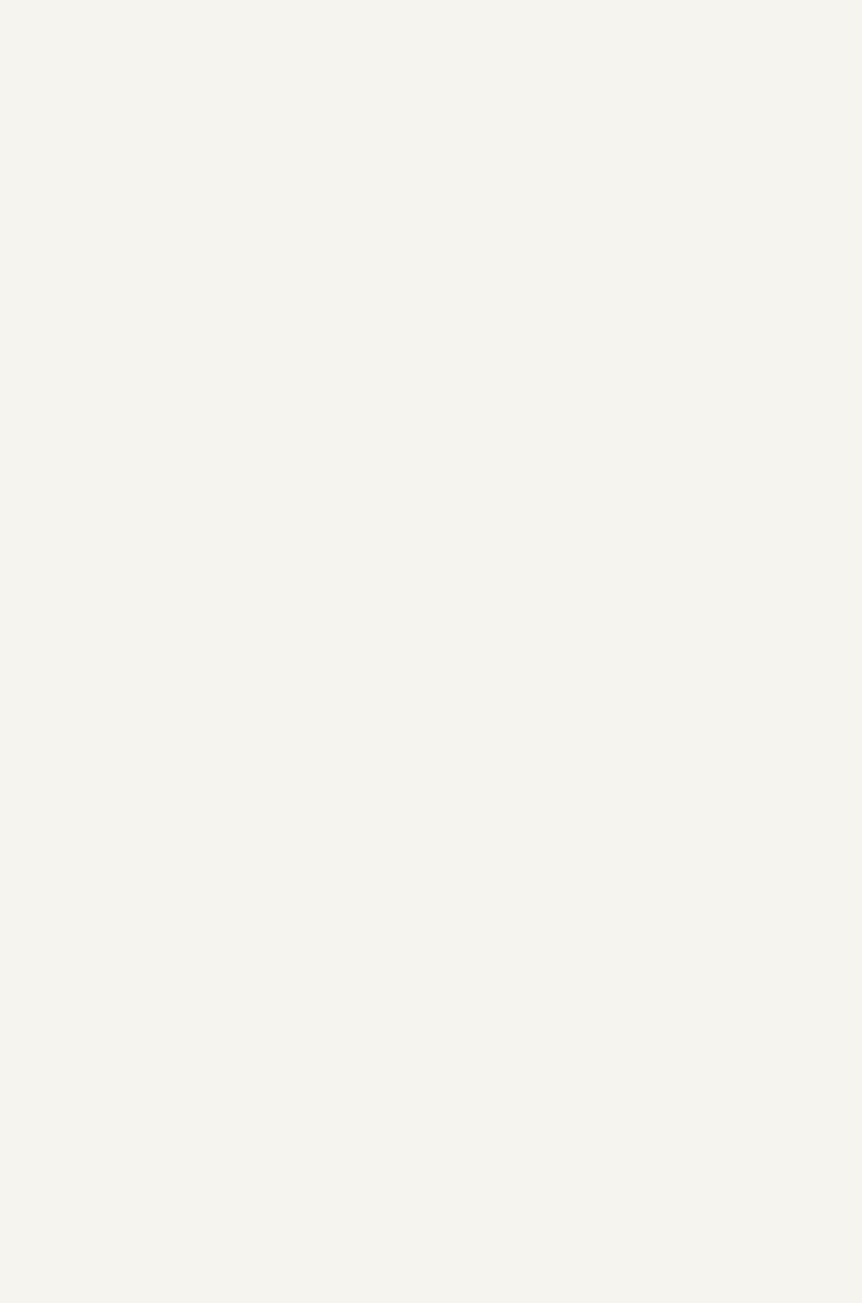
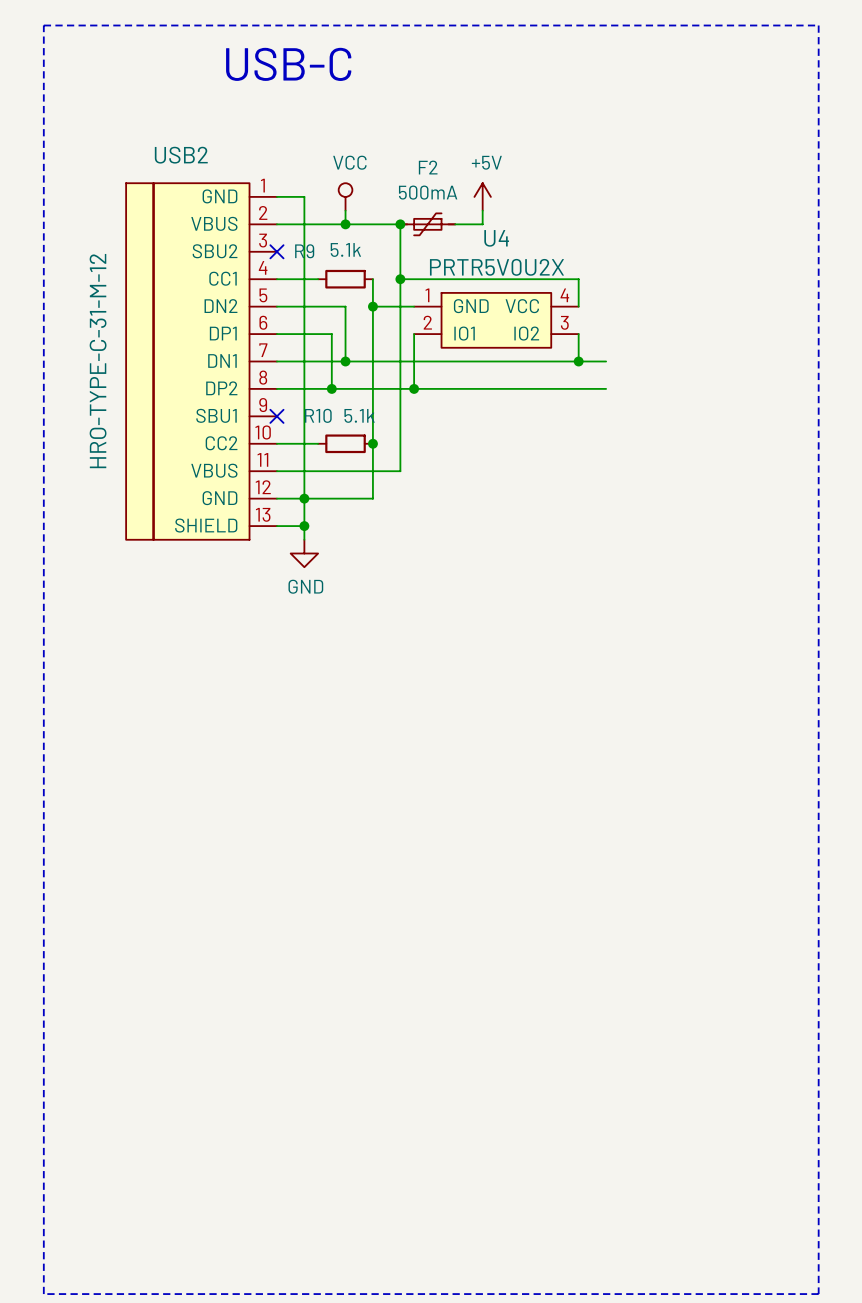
line: none -> (43, 25) (818, 25) (818, 1294) (43, 1294) (43, 25)
text: none -> USB-C (288, 64)
wire: none -> (276, 196) (304, 196) (304, 539)
power symbol: none -> VCC (345, 196)
power symbol: none -> +5V (482, 196)
wire: none -> (345, 210) (345, 224)
wire: none -> (482, 210) (482, 224) (455, 224)
wire: none -> (276, 224) (400, 224) (400, 471) (276, 471)
junction: none -> (345, 224)
junction: none -> (400, 224)
F2: none -> 500mA (427, 224)
no-connect mark: none -> (276, 251)
wire: none -> (276, 279) (318, 279)
R9: none -> 5.1k (345, 279)
wire: none -> (372, 279) (372, 498) (276, 498)
wire: none -> (400, 279) (578, 279) (578, 306)
junction: none -> (400, 279)
wire: none -> (276, 306) (345, 306) (345, 361)
wire: none -> (372, 306) (414, 306)
junction: none -> (372, 306)
U4: none -> PRTR5V0U2X (496, 320)
wire: none -> (276, 334) (331, 334) (331, 388)
wire: none -> (414, 334) (414, 388)
wire: none -> (578, 334) (578, 361)
USB2: none -> HRO-TYPE-C-31-M-12 (201, 361)
wire: none -> (276, 361) (606, 361)
junction: none -> (345, 361)
junction: none -> (578, 361)
wire: none -> (276, 388) (606, 388)
junction: none -> (331, 388)
junction: none -> (414, 388)
no-connect mark: none -> (276, 416)
wire: none -> (276, 443) (318, 443)
R10: none -> 5.1k (345, 443)
junction: none -> (372, 443)
junction: none -> (304, 498)
wire: none -> (276, 526) (304, 526)
junction: none -> (304, 526)
power symbol: none -> GND (304, 553)

